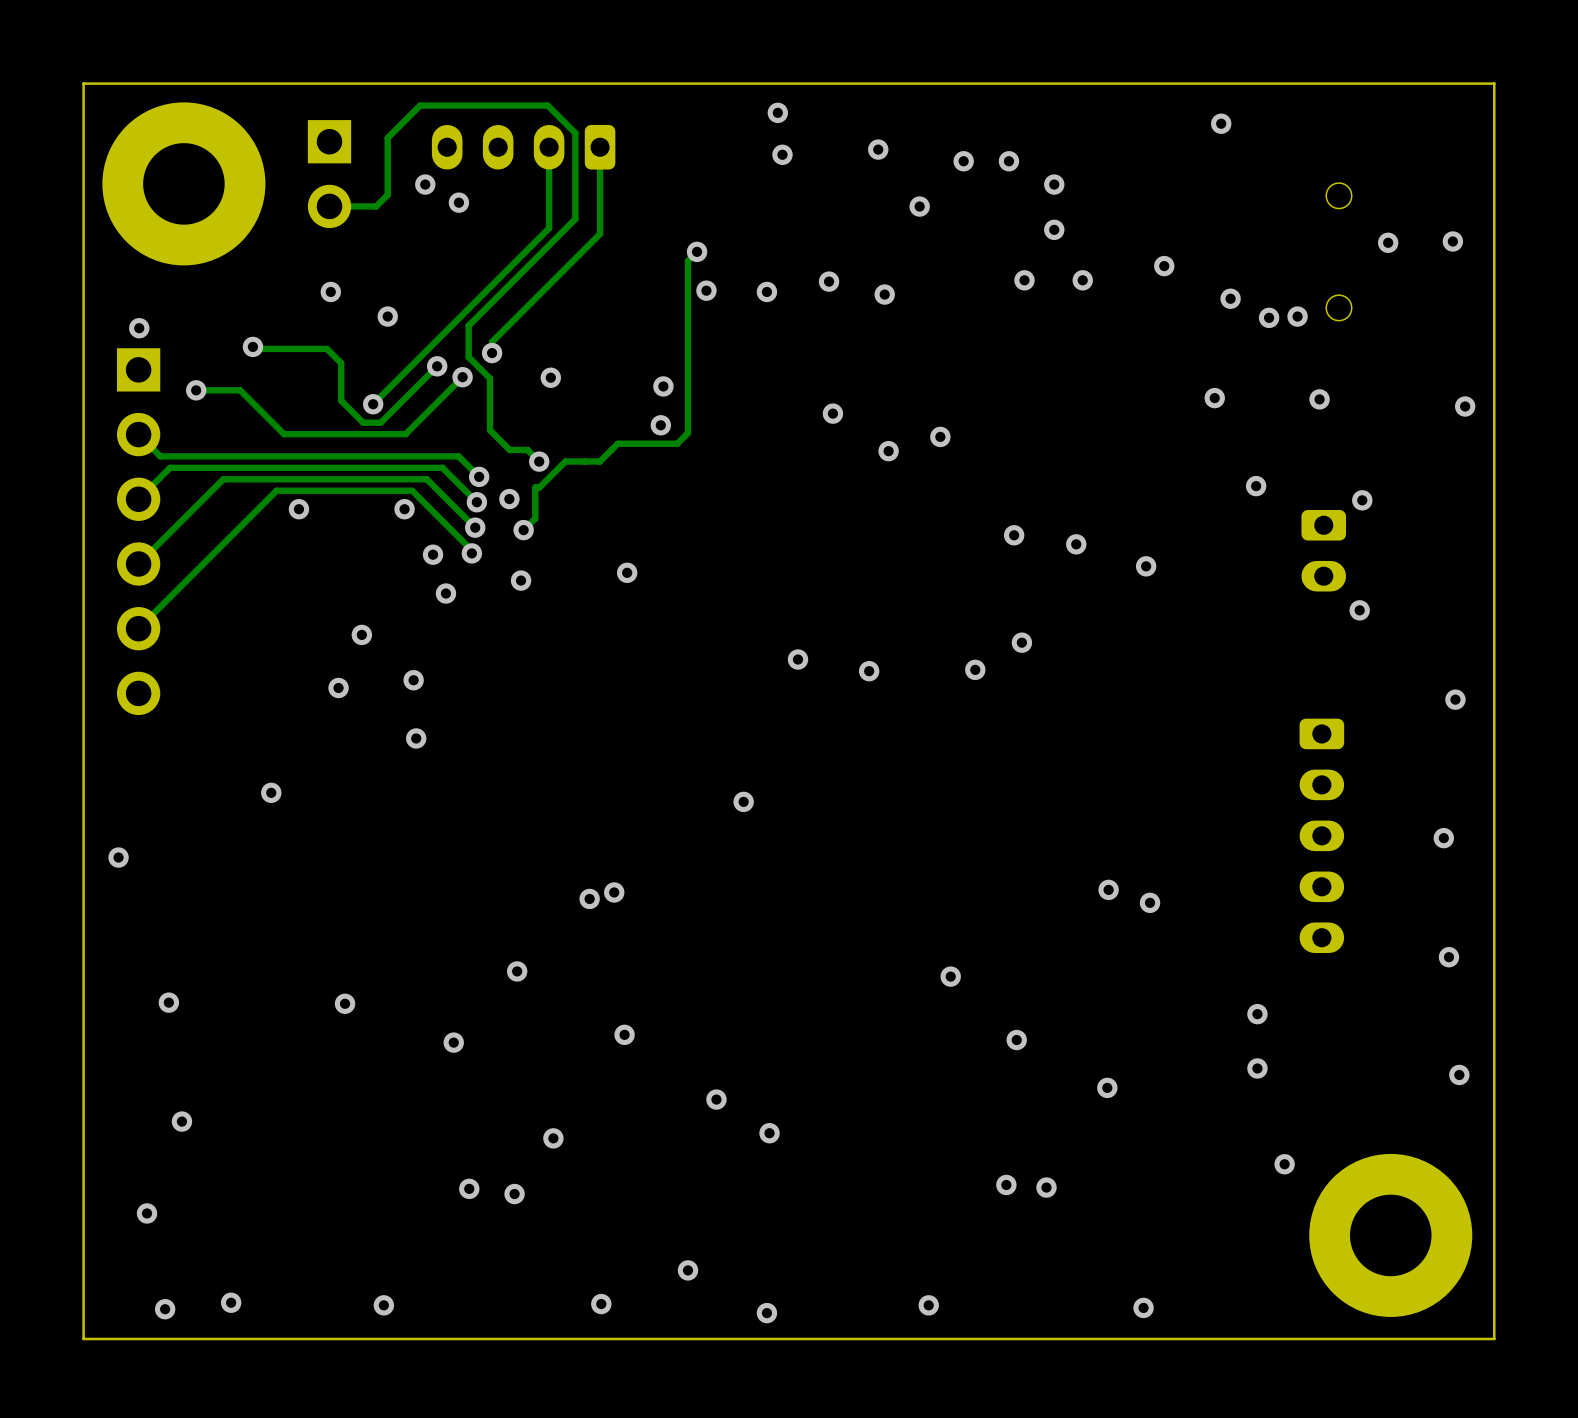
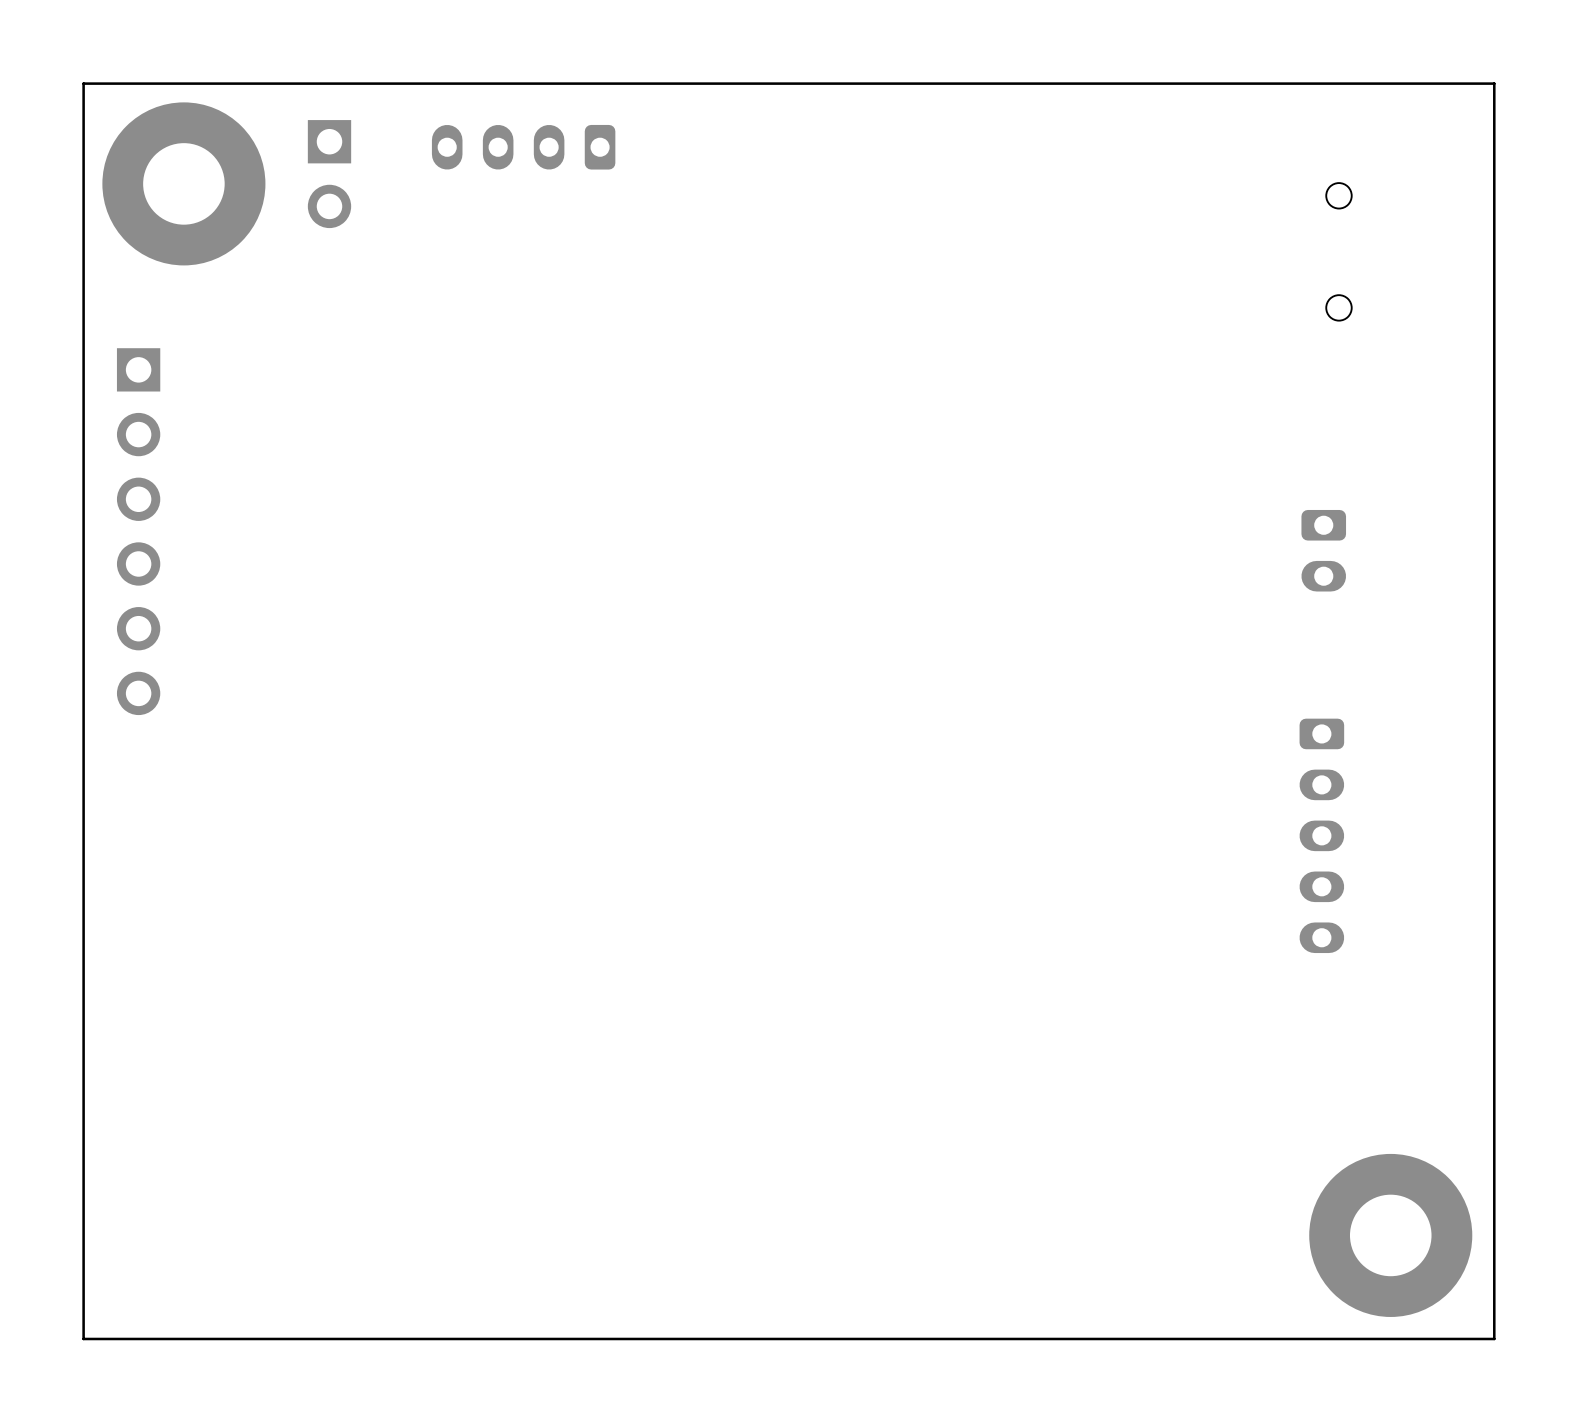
via: (777, 112) -> none
via: (1221, 123) -> none
track: (549, 147) (549, 228) (373, 404) -> none
track: (600, 147) (600, 233) (492, 341) (492, 353) -> none
via: (878, 149) -> none
via: (782, 154) -> none
via: (963, 161) -> none
via: (1008, 161) -> none
via: (425, 184) -> none
via: (1054, 184) -> none
via: (458, 202) -> none
track: (329, 206) (376, 206) (387, 194) (387, 137) (420, 105) (547, 105) (575, 133) (575, 218) (468, 325) (468, 357) (489, 378) (489, 430) (509, 449) (527, 449) (539, 461) -> none
via: (919, 206) -> none
via: (1054, 229) -> none
via: (1452, 241) -> none
via: (1388, 242) -> none
track: (697, 251) (688, 260) (688, 433) (677, 443) (617, 443) (599, 461) (565, 461) (539, 487) (535, 487) (535, 518) (523, 530) -> none
via: (697, 251) -> none
via: (1164, 266) -> none
via: (1024, 280) -> none
via: (1082, 280) -> none
via: (829, 281) -> none
via: (706, 290) -> none
via: (330, 291) -> none
via: (766, 291) -> none
via: (884, 294) -> none
via: (1230, 298) -> none
via: (387, 316) -> none
via: (1297, 316) -> none
via: (1269, 317) -> none
via: (139, 328) -> none
track: (252, 346) (254, 348) (326, 348) (341, 363) (341, 400) (363, 422) (380, 422) (437, 366) -> none
via: (252, 346) -> none
via: (492, 353) -> none
via: (437, 366) -> none
track: (462, 377) (405, 434) (284, 434) (240, 390) (196, 390) -> none
via: (462, 377) -> none
via: (550, 377) -> none
via: (663, 386) -> none
via: (196, 390) -> none
via: (1214, 398) -> none
via: (1319, 399) -> none
via: (373, 404) -> none
via: (1465, 406) -> none
via: (832, 413) -> none
via: (660, 425) -> none
track: (138, 434) (160, 456) (458, 456) (479, 476) -> none
via: (940, 436) -> none
via: (888, 451) -> none
via: (539, 461) -> none
via: (479, 476) -> none
via: (1256, 486) -> none
track: (138, 499) (170, 467) (442, 467) (476, 502) -> none
via: (509, 499) -> none
via: (1362, 500) -> none
via: (476, 502) -> none
via: (298, 509) -> none
via: (404, 509) -> none
track: (475, 527) (426, 479) (223, 479) (138, 563) -> none
via: (475, 527) -> none
via: (523, 530) -> none
via: (1014, 535) -> none
via: (1076, 544) -> none
track: (471, 553) (471, 550) (412, 490) (276, 490) (138, 628) -> none
via: (471, 553) -> none
via: (433, 554) -> none
via: (1146, 566) -> none
via: (627, 572) -> none
via: (521, 580) -> none
via: (445, 593) -> none
via: (1359, 610) -> none
via: (361, 634) -> none
via: (1021, 642) -> none
via: (798, 659) -> none
via: (975, 669) -> none
via: (869, 671) -> none
via: (413, 680) -> none
via: (338, 688) -> none
via: (1455, 699) -> none
via: (416, 738) -> none
via: (271, 792) -> none
via: (743, 801) -> none
via: (1443, 838) -> none
via: (118, 857) -> none
via: (1108, 889) -> none
via: (614, 892) -> none
via: (589, 898) -> none
via: (1150, 902) -> none
via: (1448, 957) -> none
via: (517, 971) -> none
via: (950, 976) -> none
via: (168, 1002) -> none
via: (345, 1003) -> none
via: (1257, 1014) -> none
via: (624, 1034) -> none
via: (1016, 1040) -> none
via: (453, 1042) -> none
via: (1257, 1068) -> none
via: (1459, 1074) -> none
via: (1107, 1087) -> none
via: (716, 1099) -> none
via: (181, 1121) -> none
via: (769, 1133) -> none
via: (553, 1138) -> none
via: (1284, 1164) -> none
via: (1006, 1184) -> none
via: (1046, 1187) -> none
via: (469, 1188) -> none
via: (514, 1194) -> none
via: (147, 1213) -> none
via: (688, 1270) -> none
via: (231, 1302) -> none
via: (601, 1304) -> none
via: (383, 1305) -> none
via: (928, 1305) -> none
via: (1143, 1307) -> none
via: (165, 1309) -> none
via: (766, 1313) -> none

